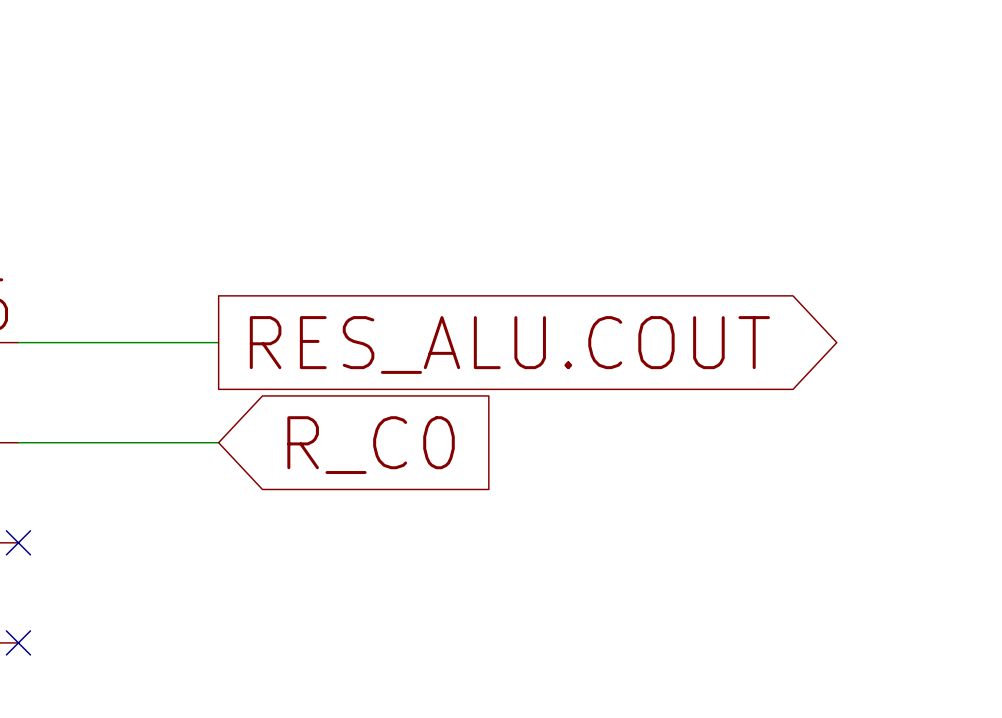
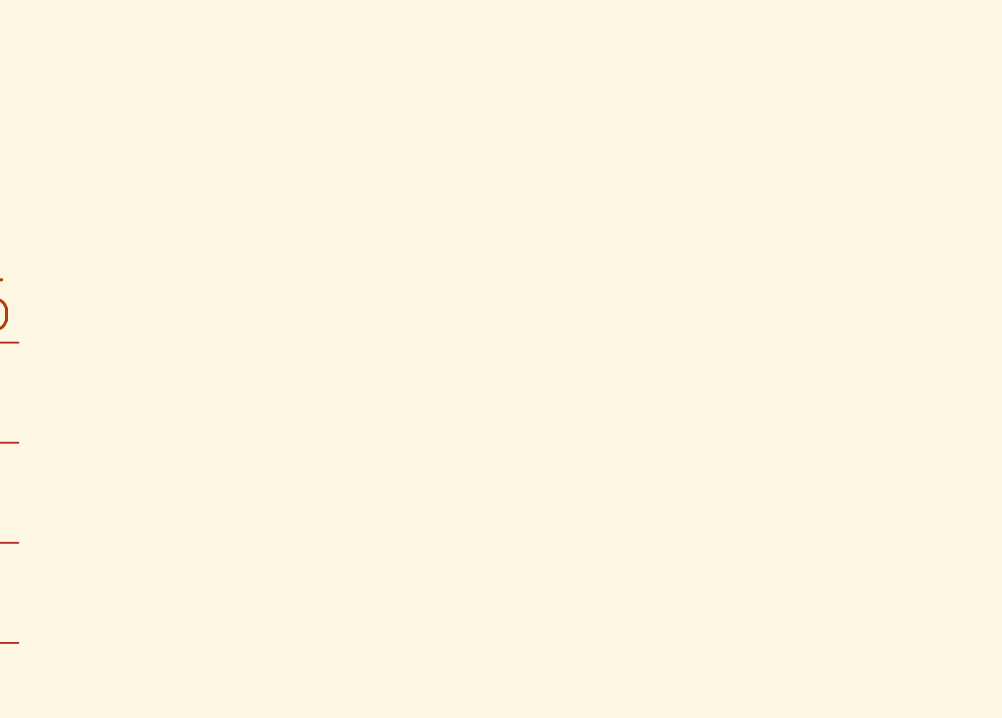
wire: (18, 342) (218, 342) -> none
global label: RES_ALU.COUT (509, 345) -> none
wire: (18, 442) (218, 442) -> none
global label: R_C0 (371, 445) -> none
no-connect mark: (18, 542) -> none
no-connect mark: (18, 642) -> none

